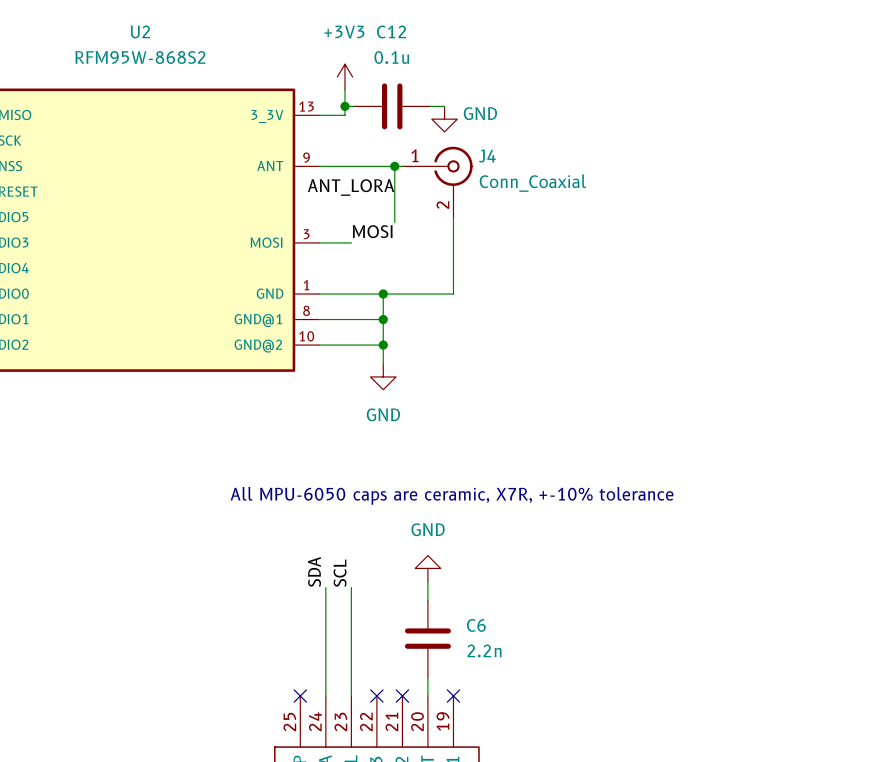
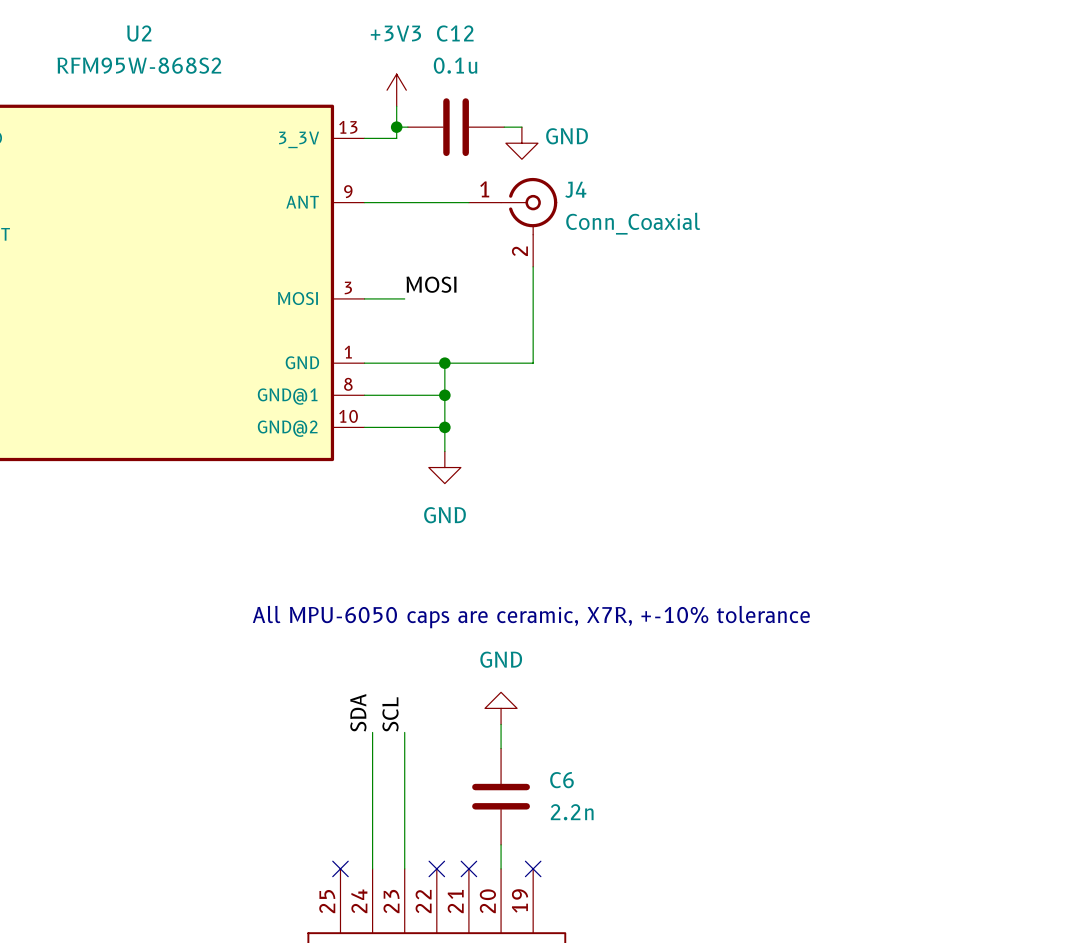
wire: (394, 166) (394, 222) -> none
junction: (394, 166) -> none
label: ANT_LORA (351, 187) -> none

